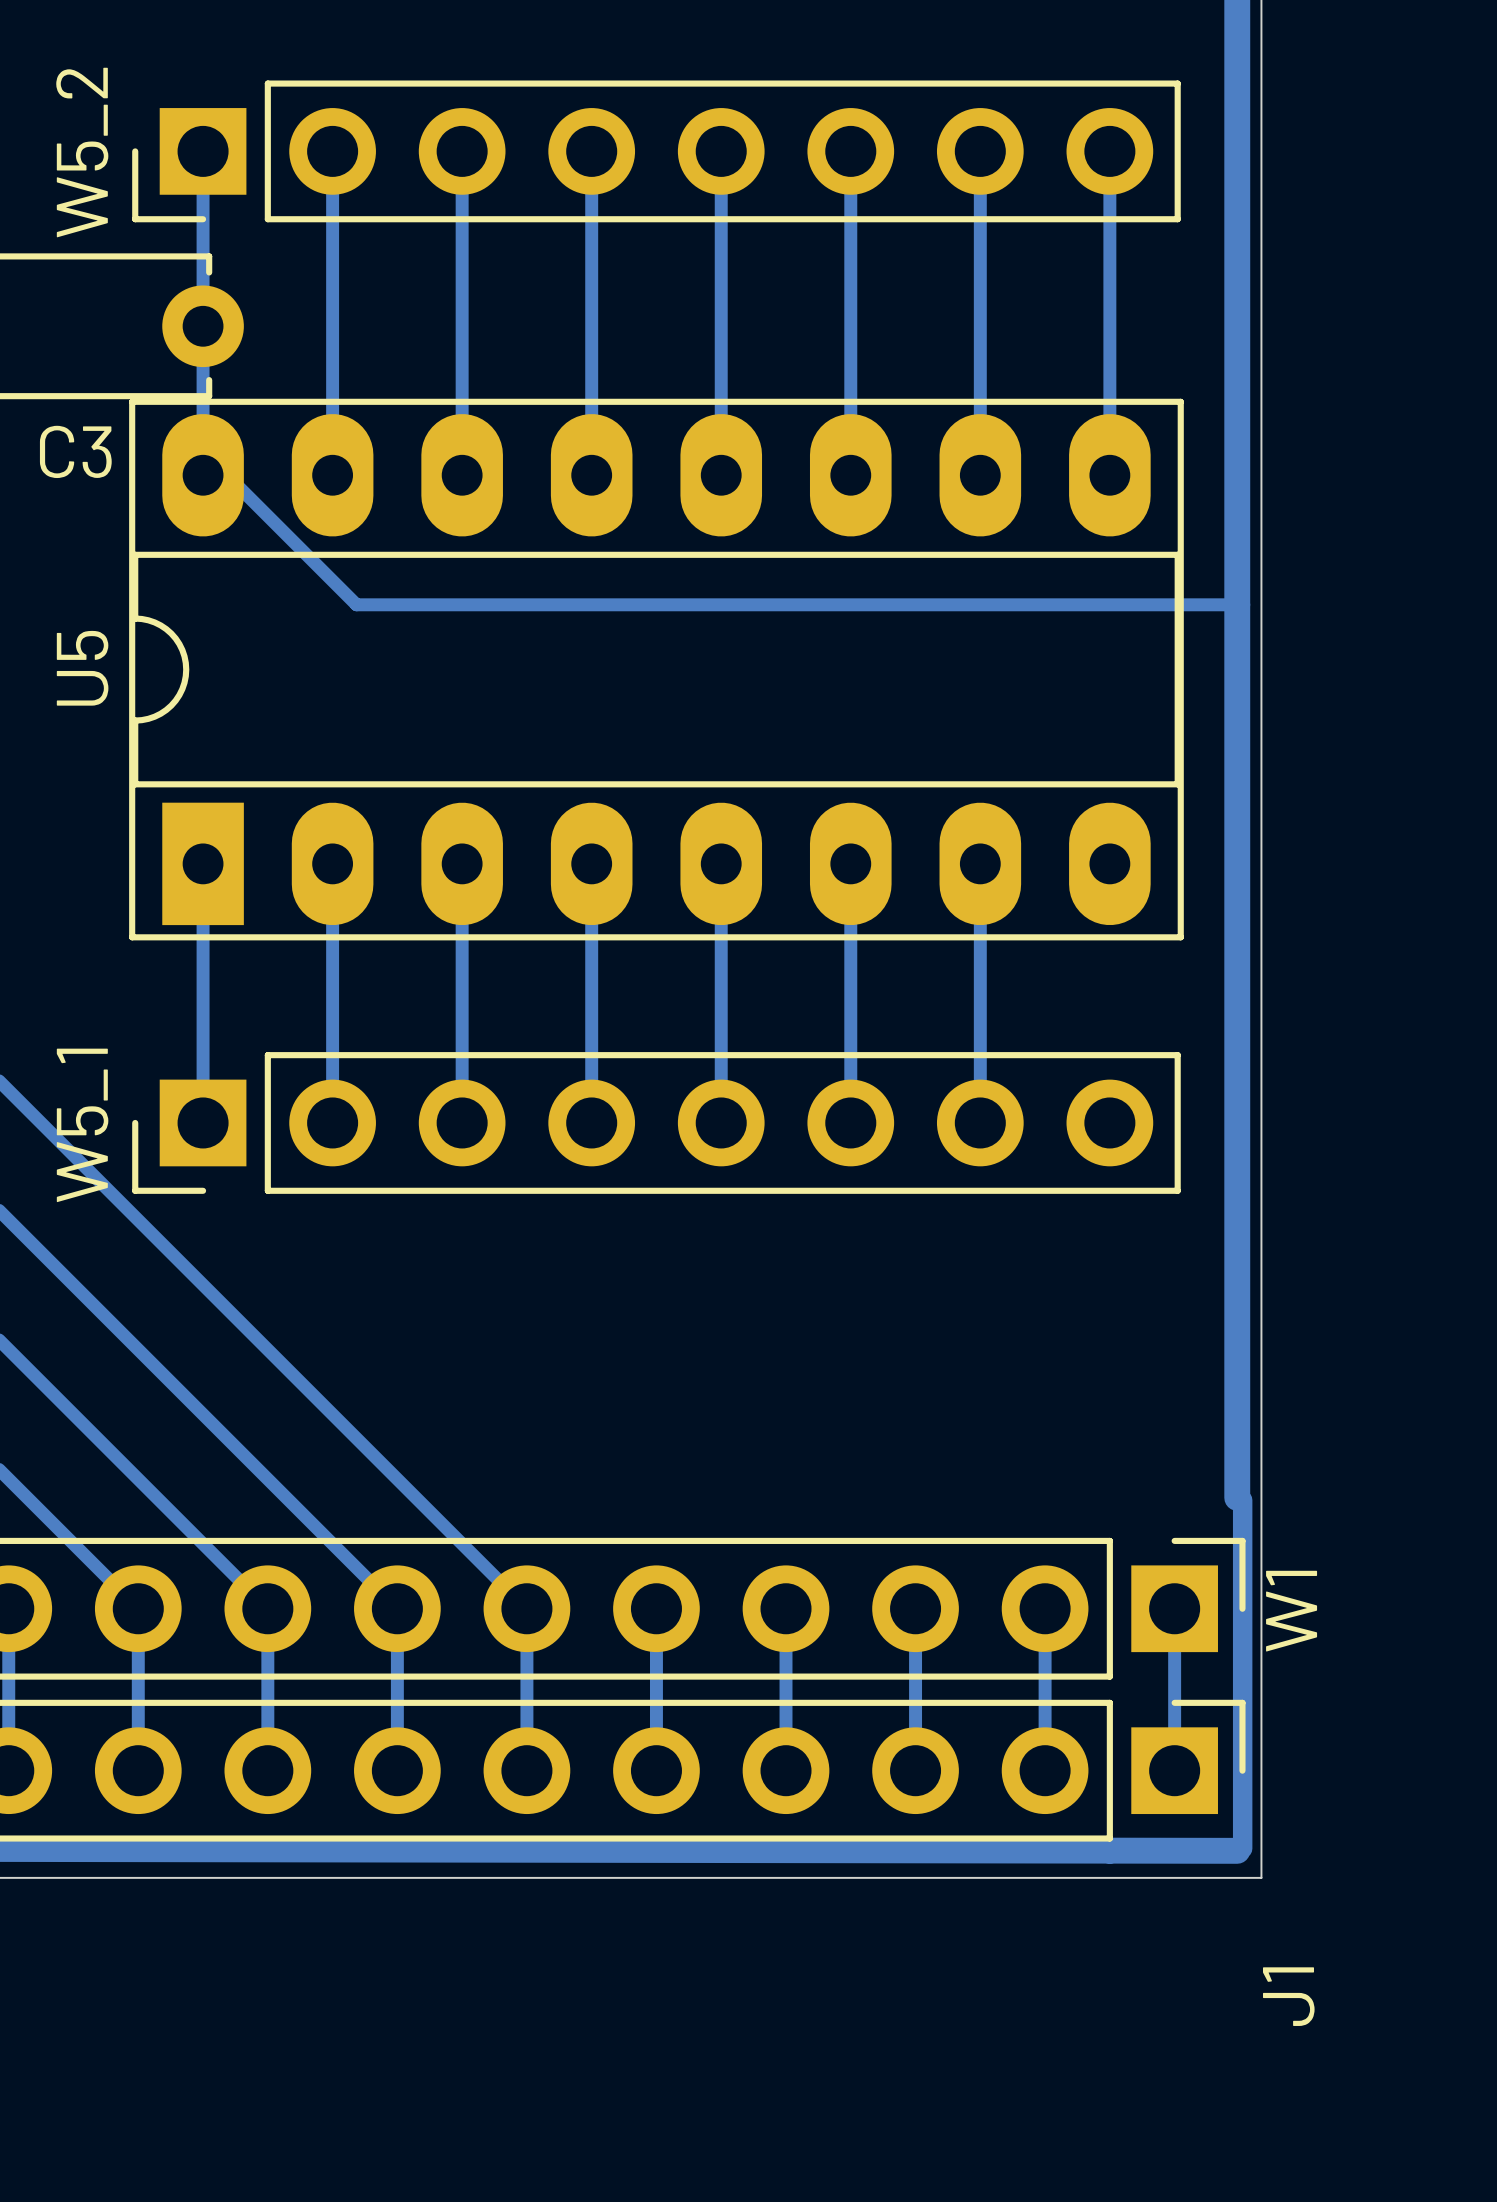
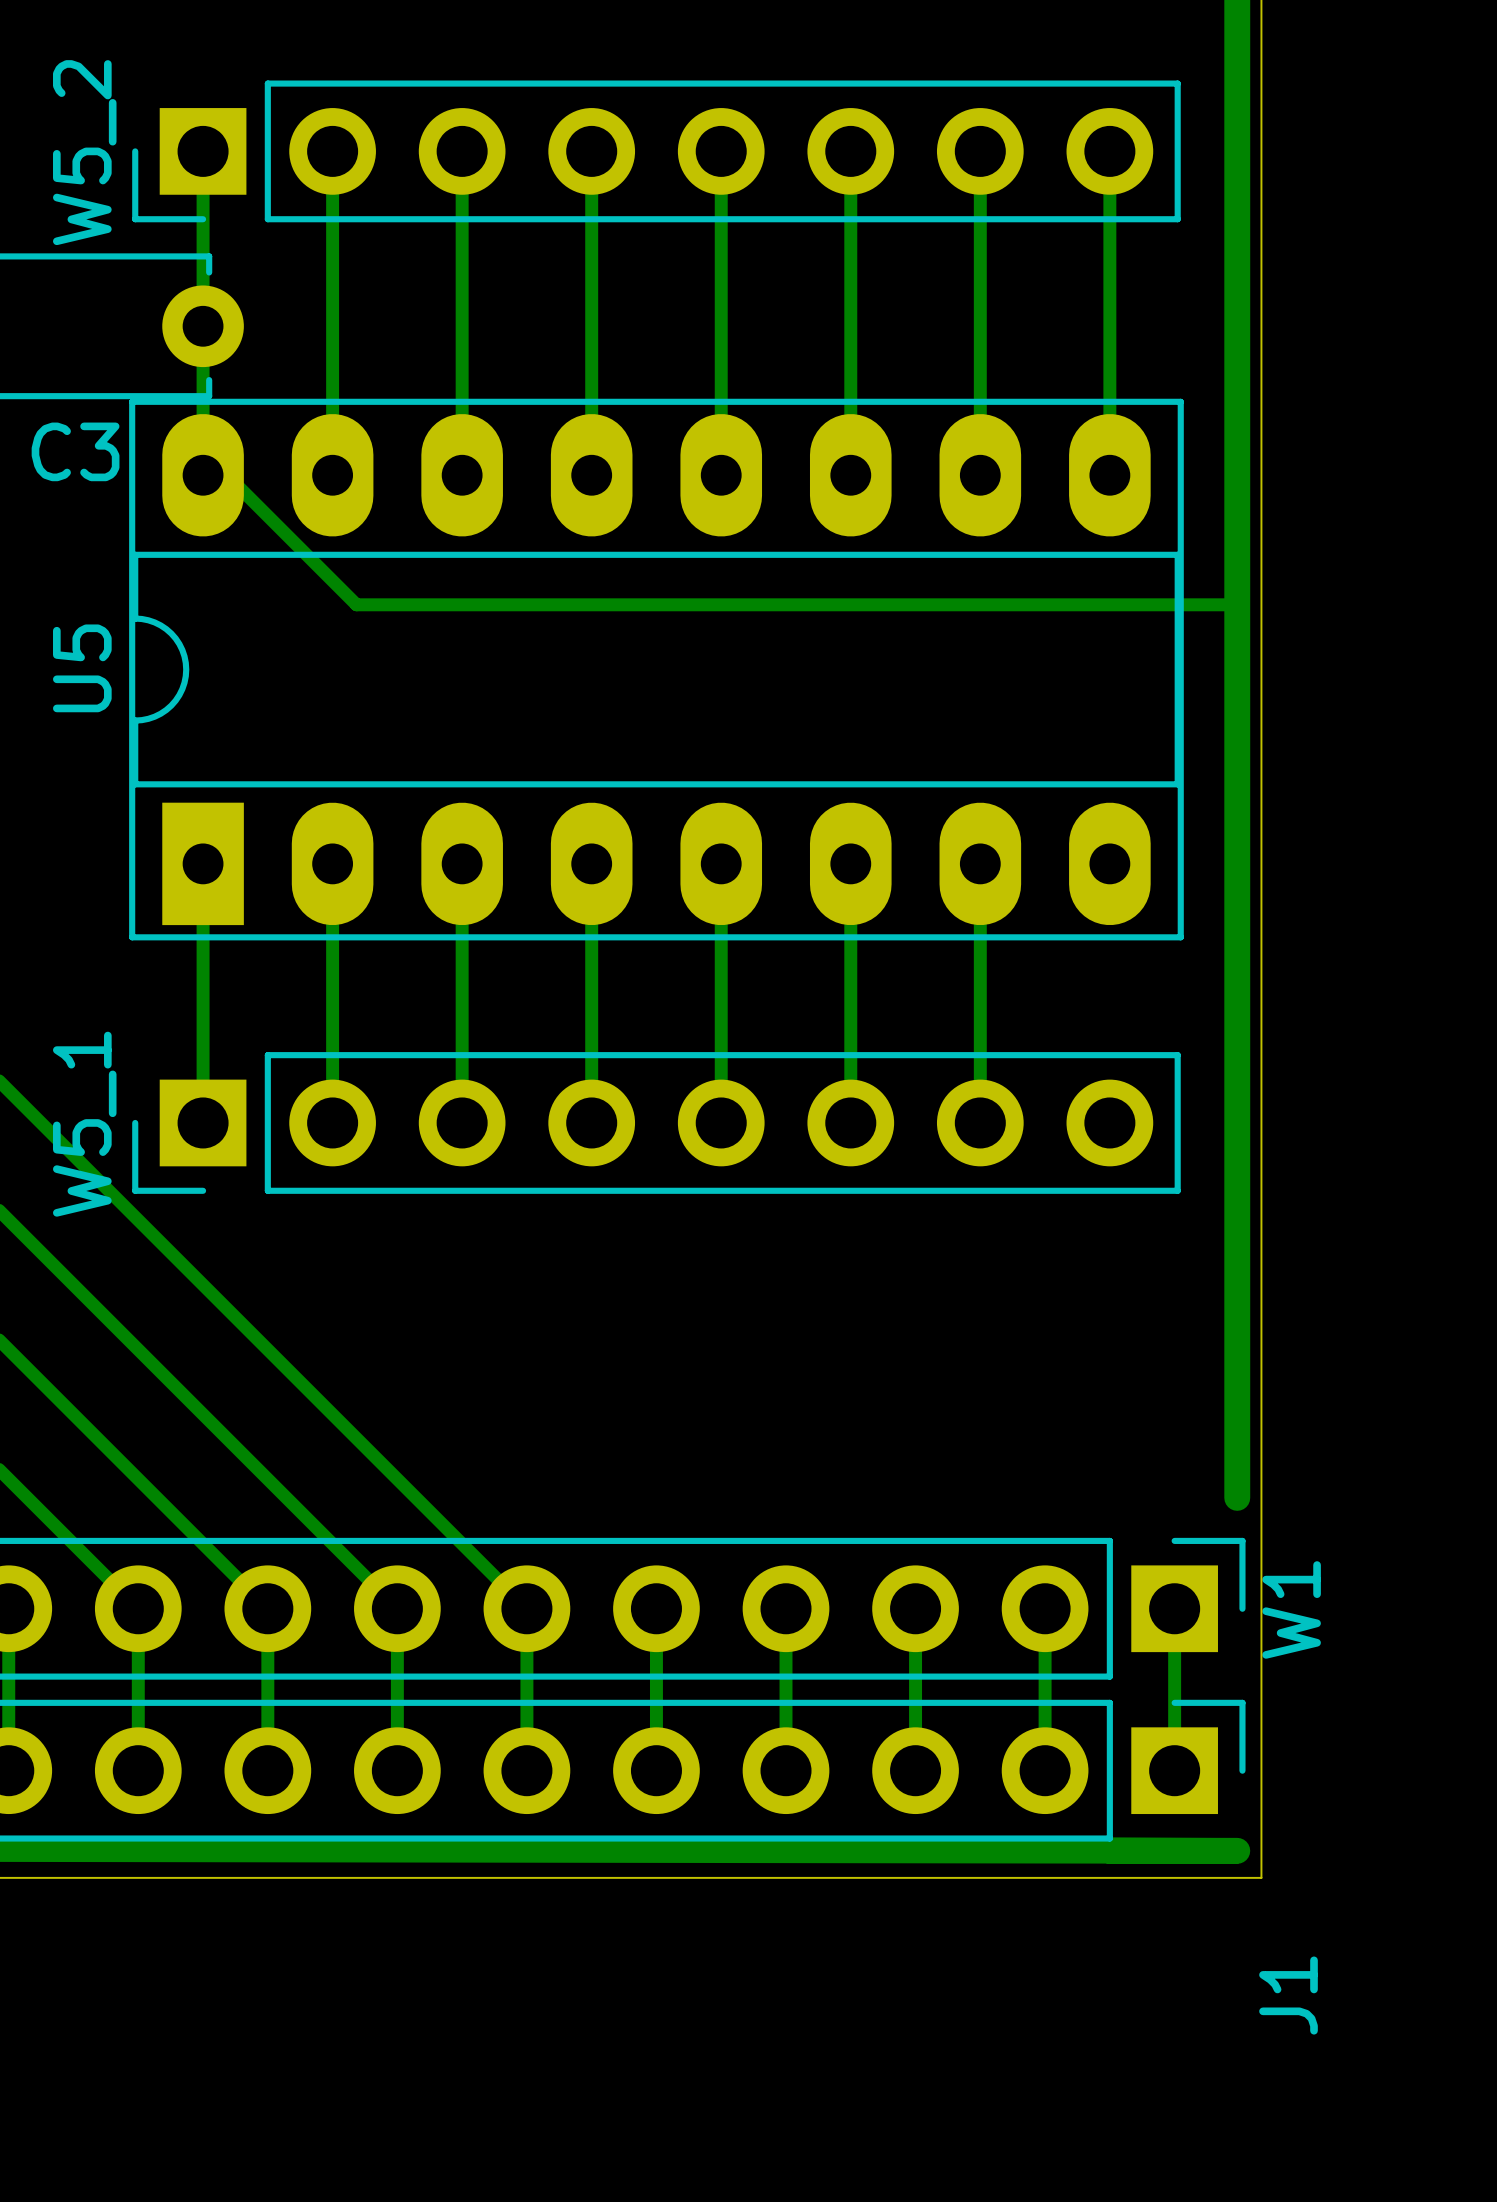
bottom track: (1242, 1500) (1242, 1848) -> none

